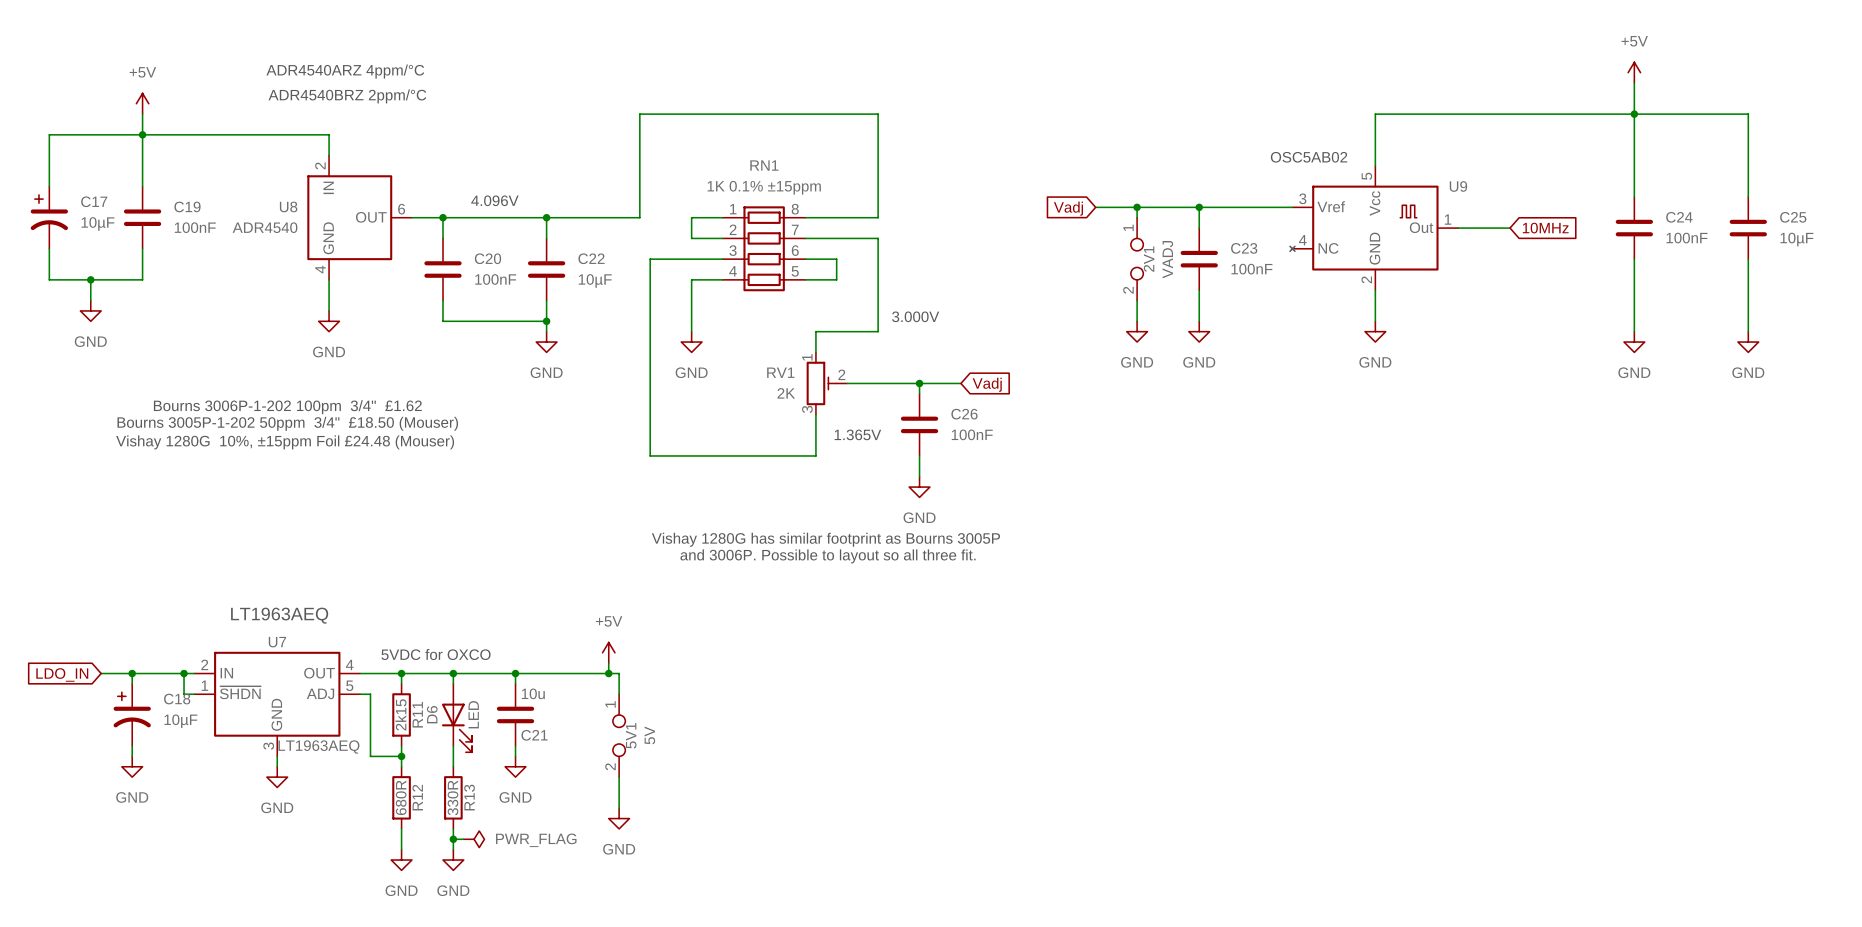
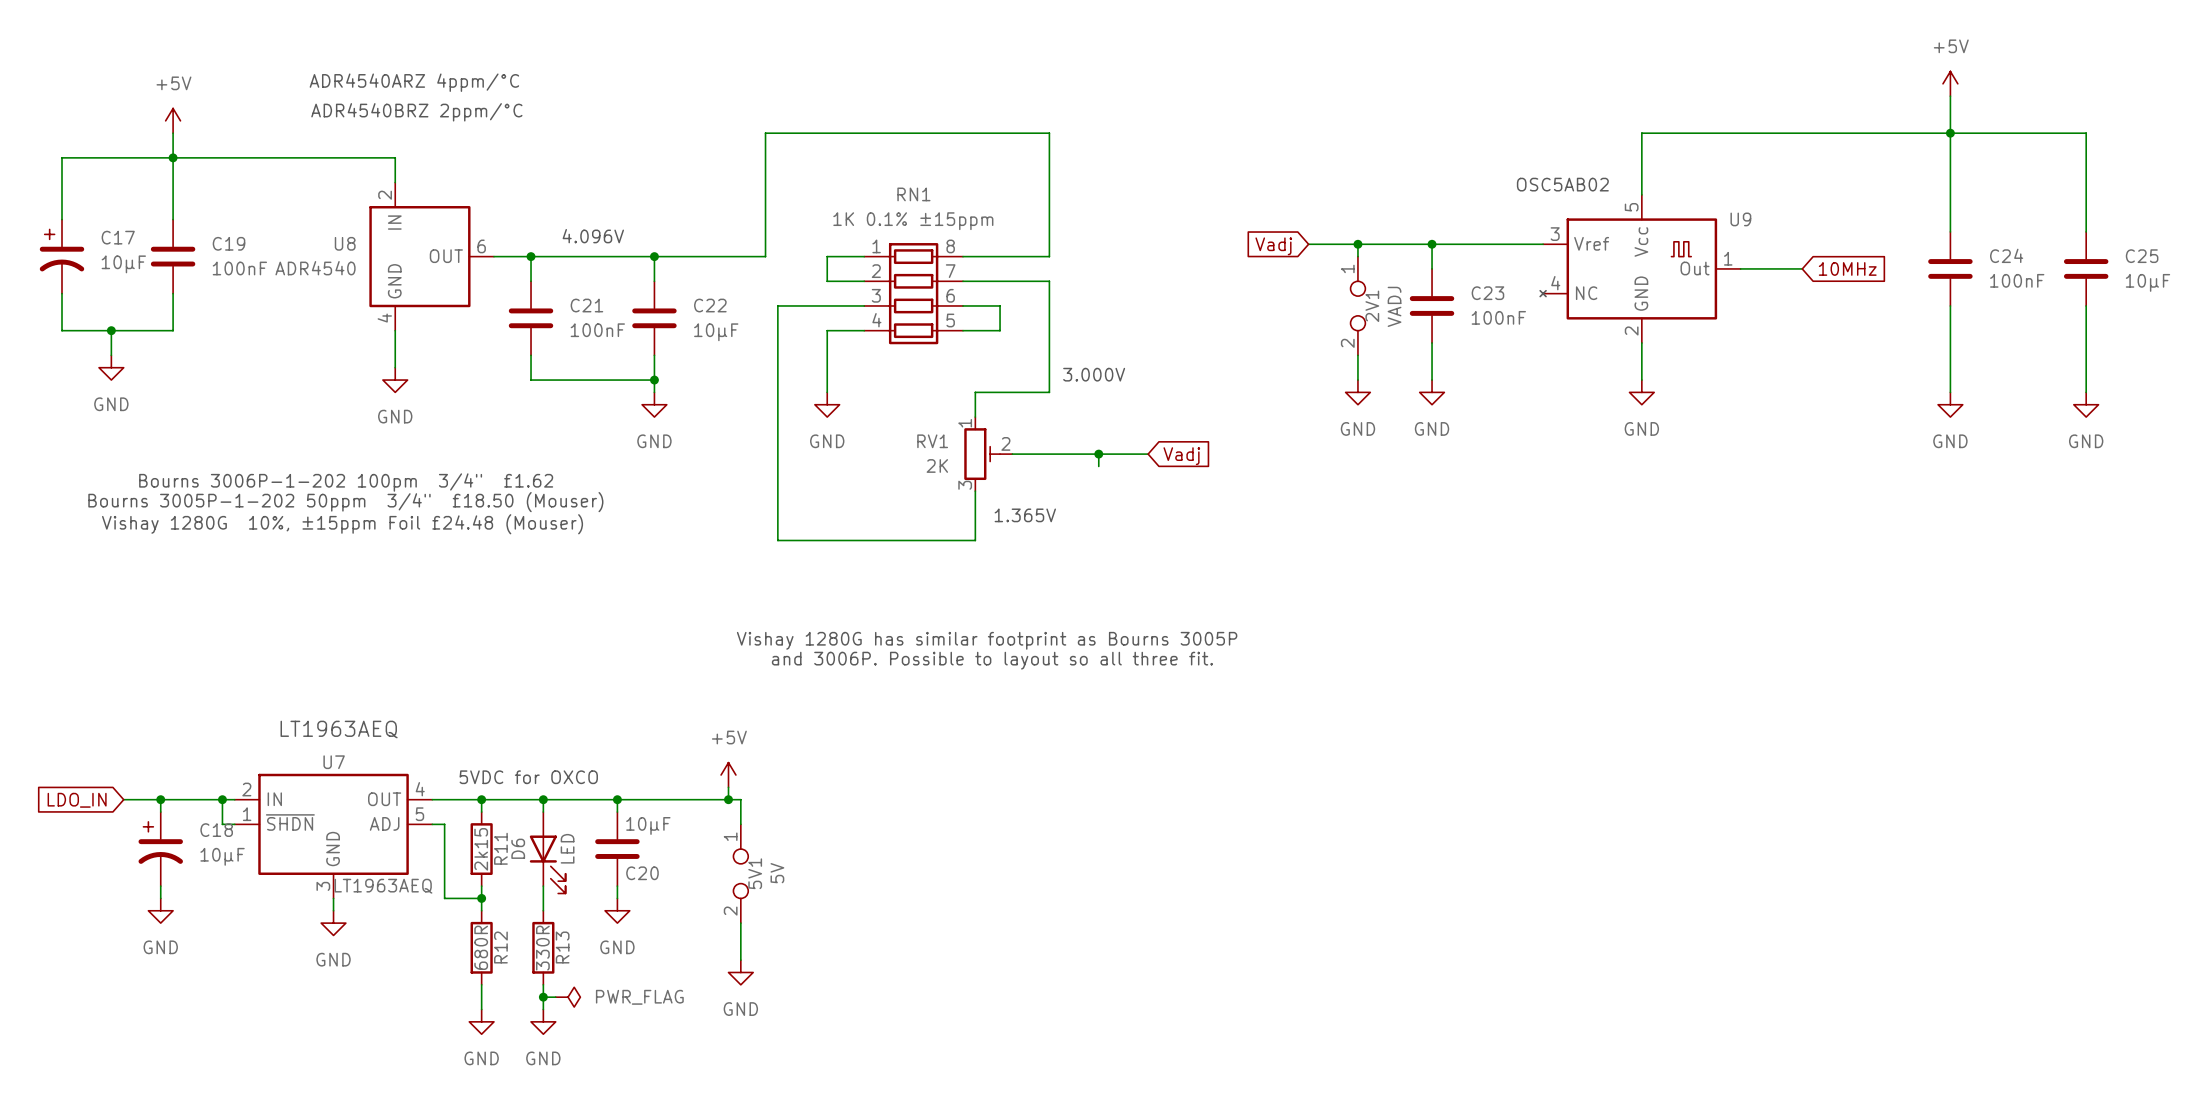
C20 name: C20 (487, 258) -> C21 (586, 305)
C26: 100nF (919, 424) -> none
wire: (919, 455) (919, 476) -> none
power symbol: GND (919, 487) -> none
C21 value: 10u (533, 693) -> 10µF (648, 825)
C21 name: C21 (534, 735) -> C20 (642, 873)

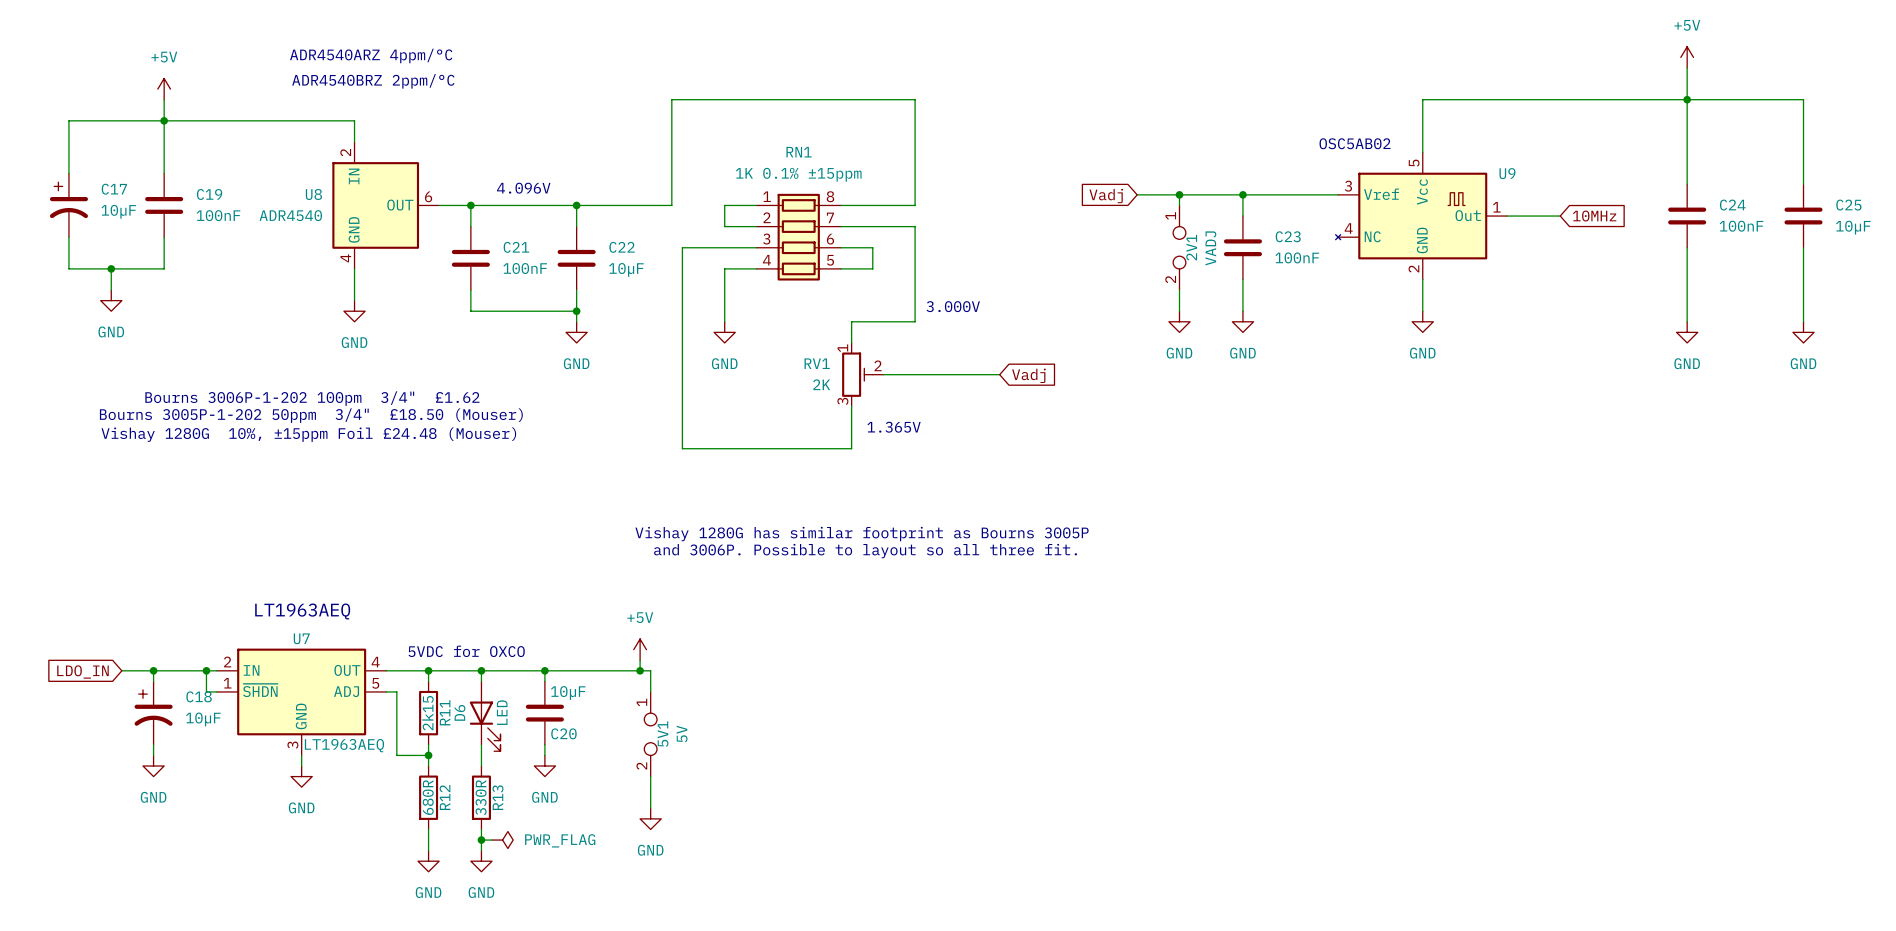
wire: (1098, 454) (1098, 466) -> none
junction: (1098, 454) -> none

